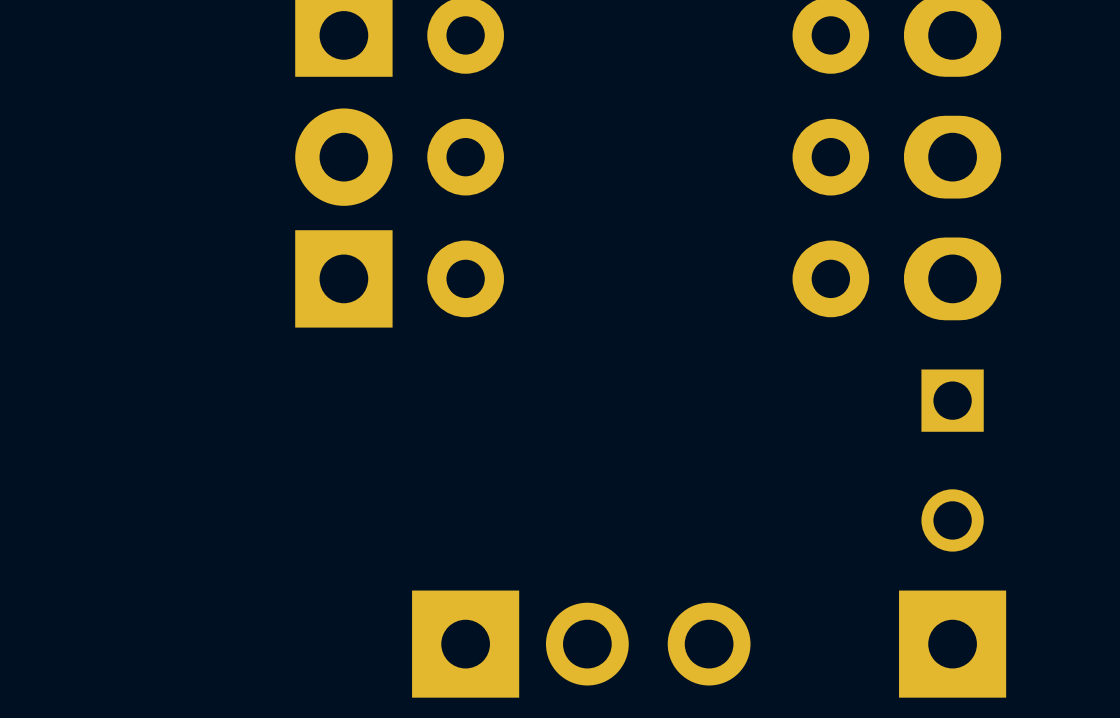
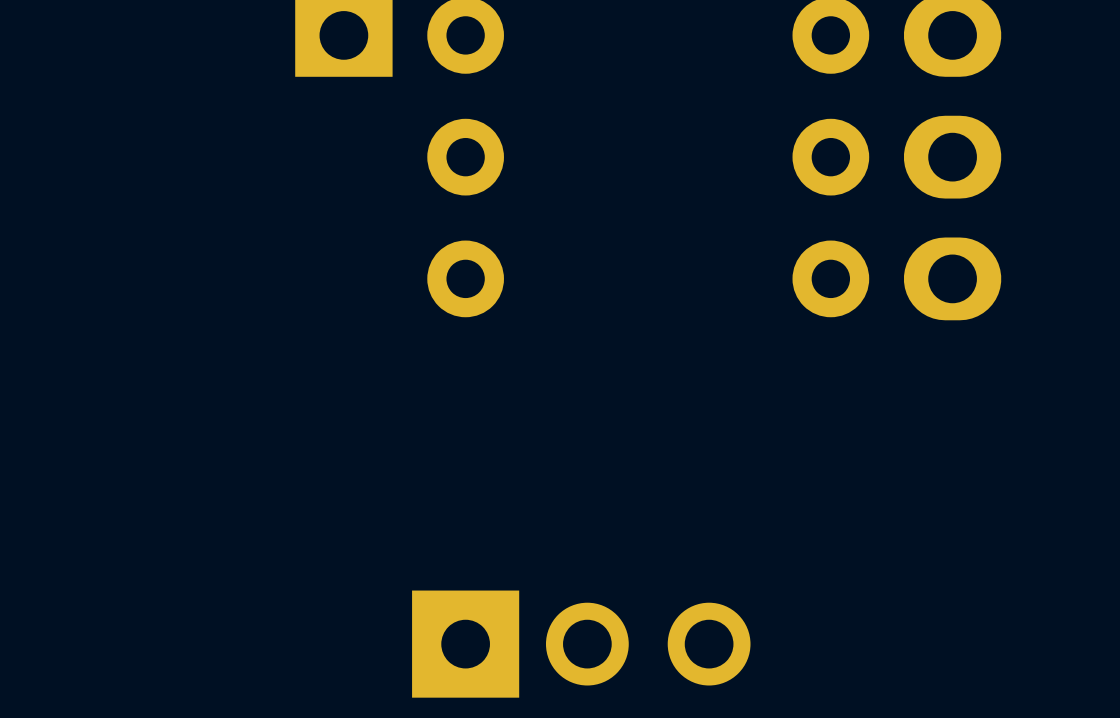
part: (343, 218) -> none
part: (952, 460) -> none
part: (952, 644) -> none

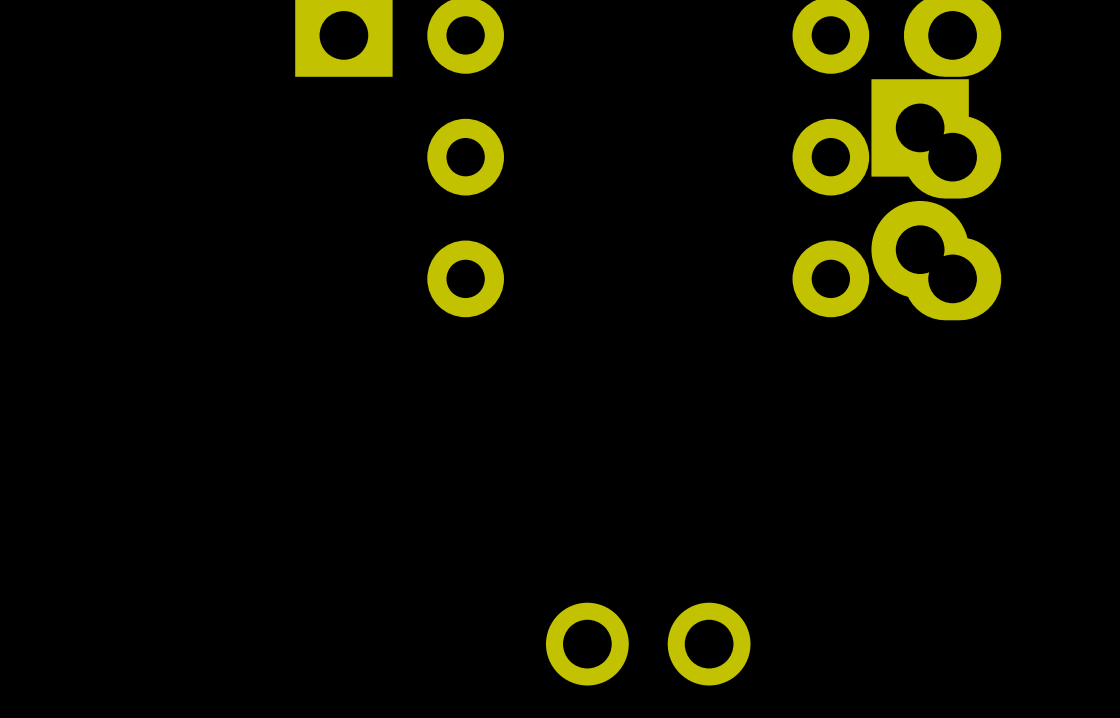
part: none -> (920, 188)
part: (465, 644) -> none

